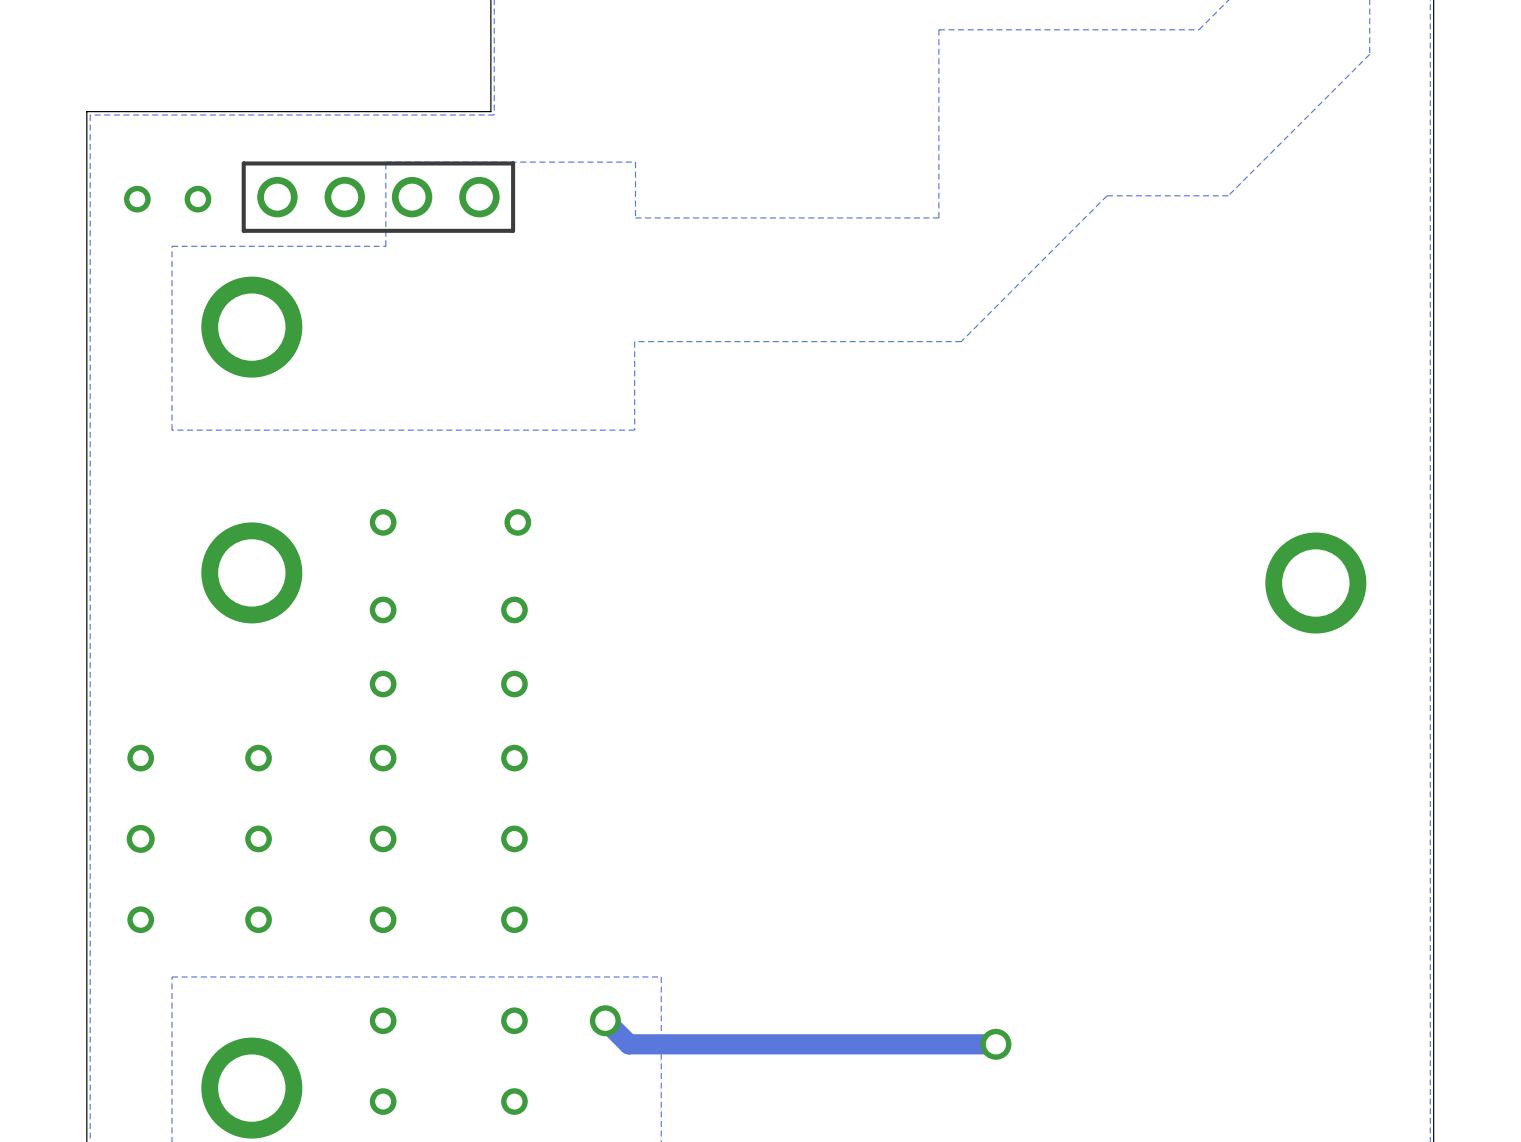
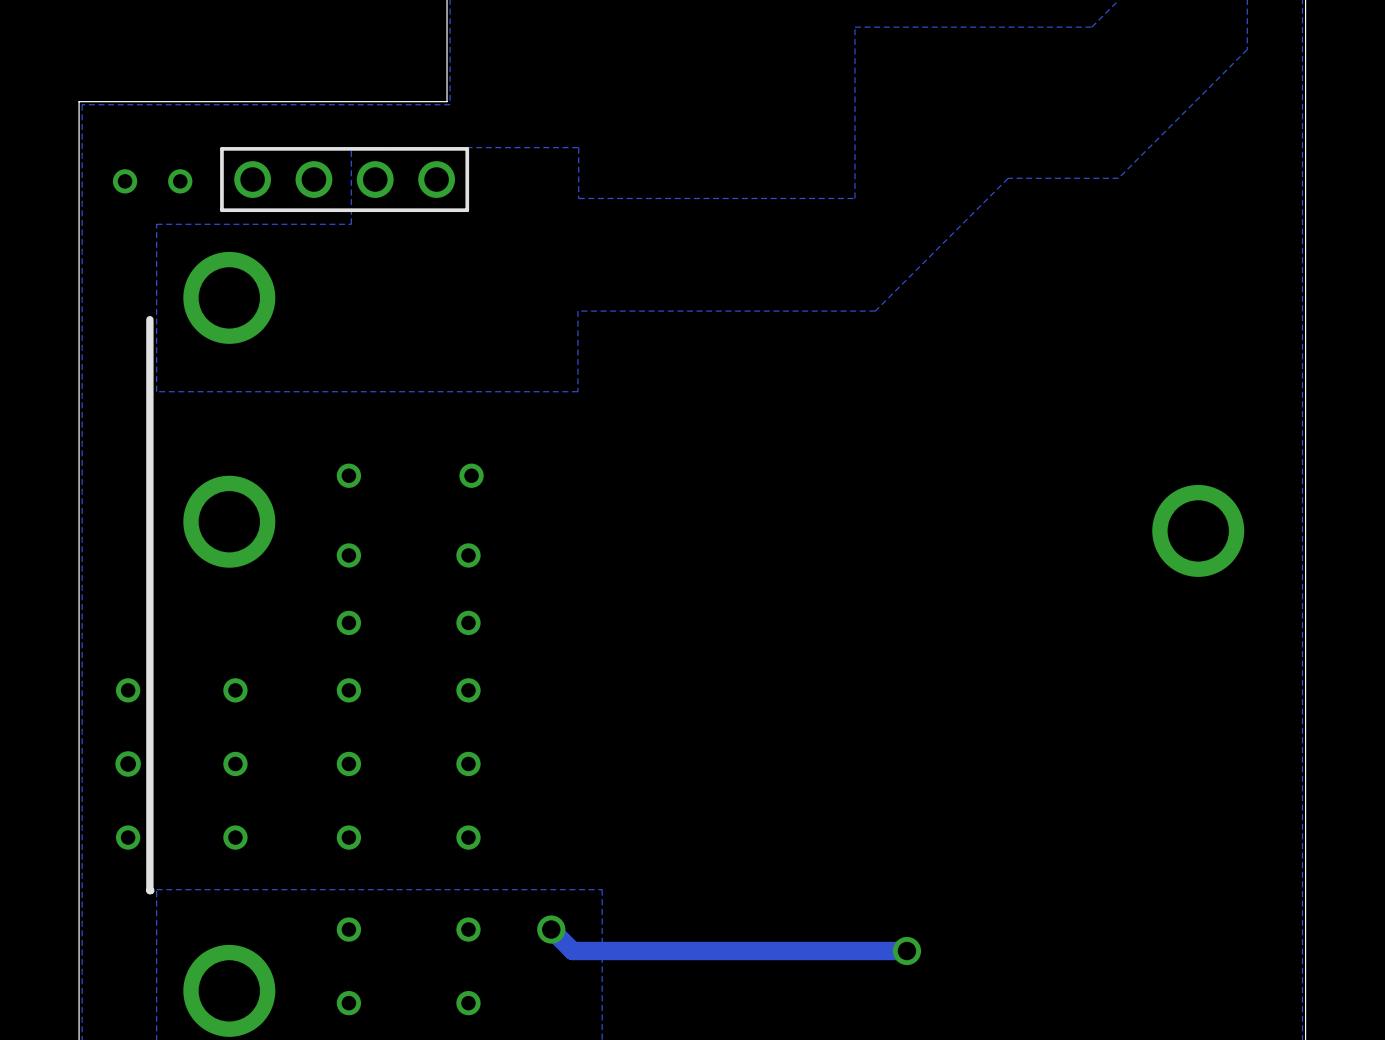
line: none -> (149, 319) (150, 890)

